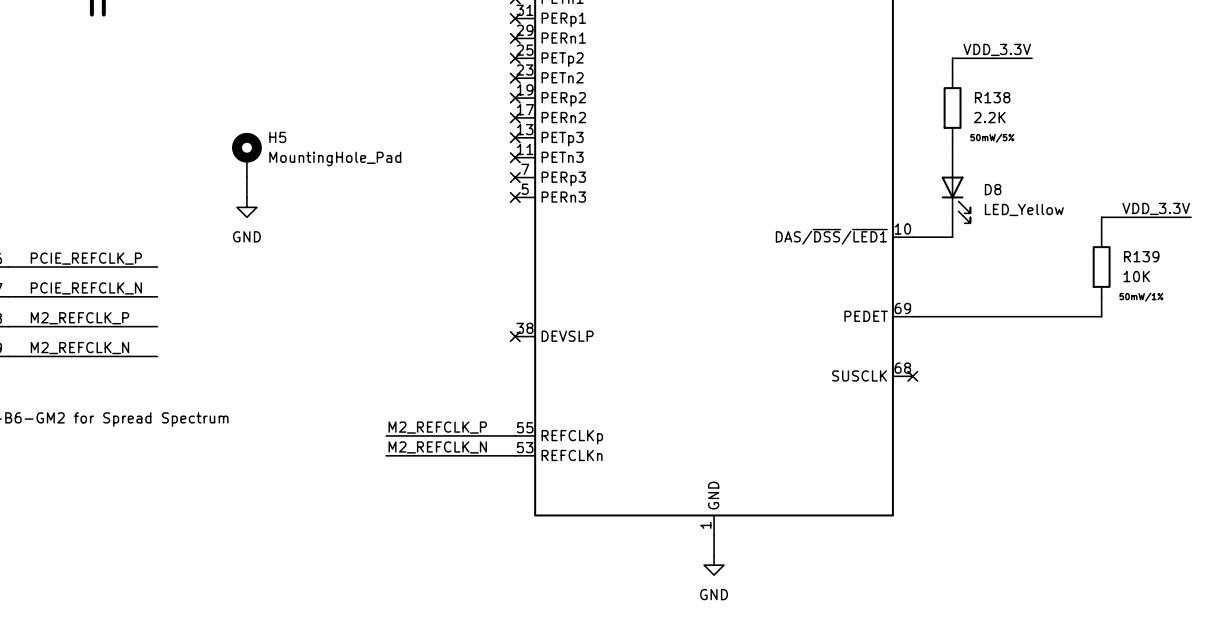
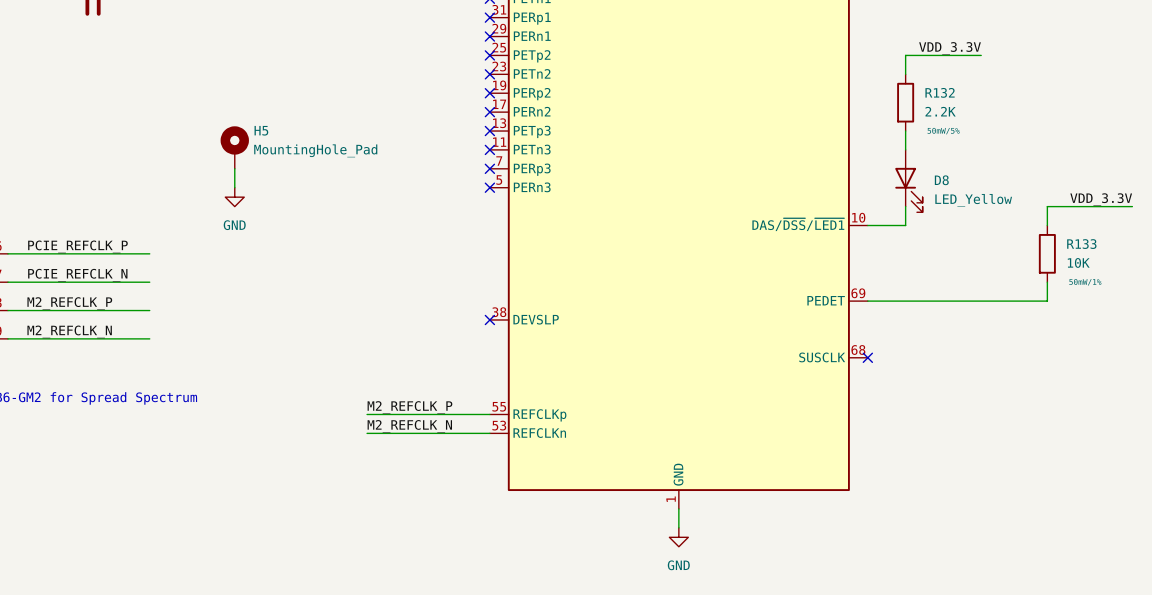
R138 name: R138 (992, 97) -> R132 (940, 92)
R139 name: R139 (1141, 256) -> R133 (1081, 244)

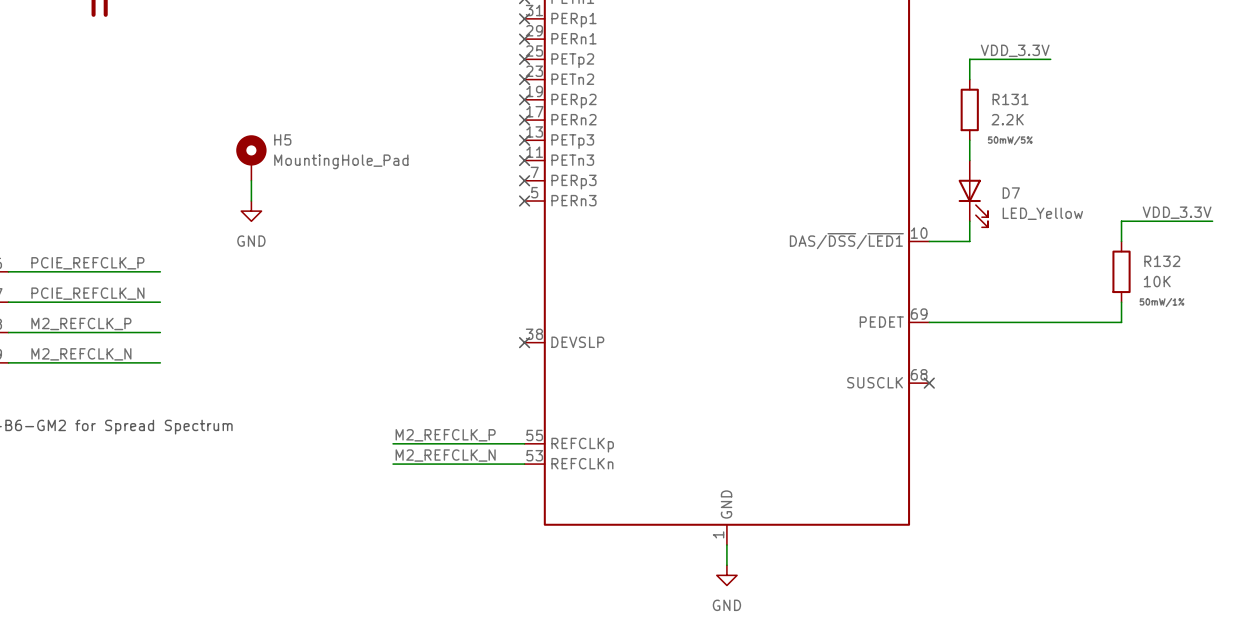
R132 name: R132 (940, 92) -> R131 (1010, 99)
D8 name: D8 (941, 180) -> D7 (1011, 193)
R133 name: R133 (1081, 244) -> R132 (1162, 261)

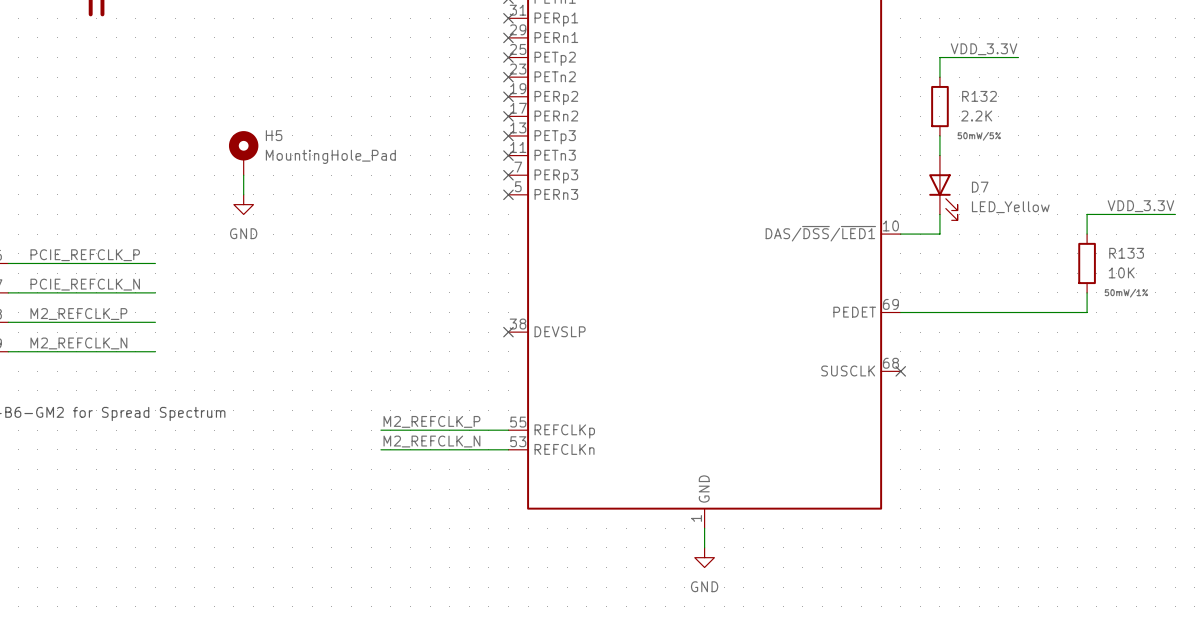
R131 name: R131 (1010, 99) -> R132 (979, 96)
R132 name: R132 (1162, 261) -> R133 (1126, 253)

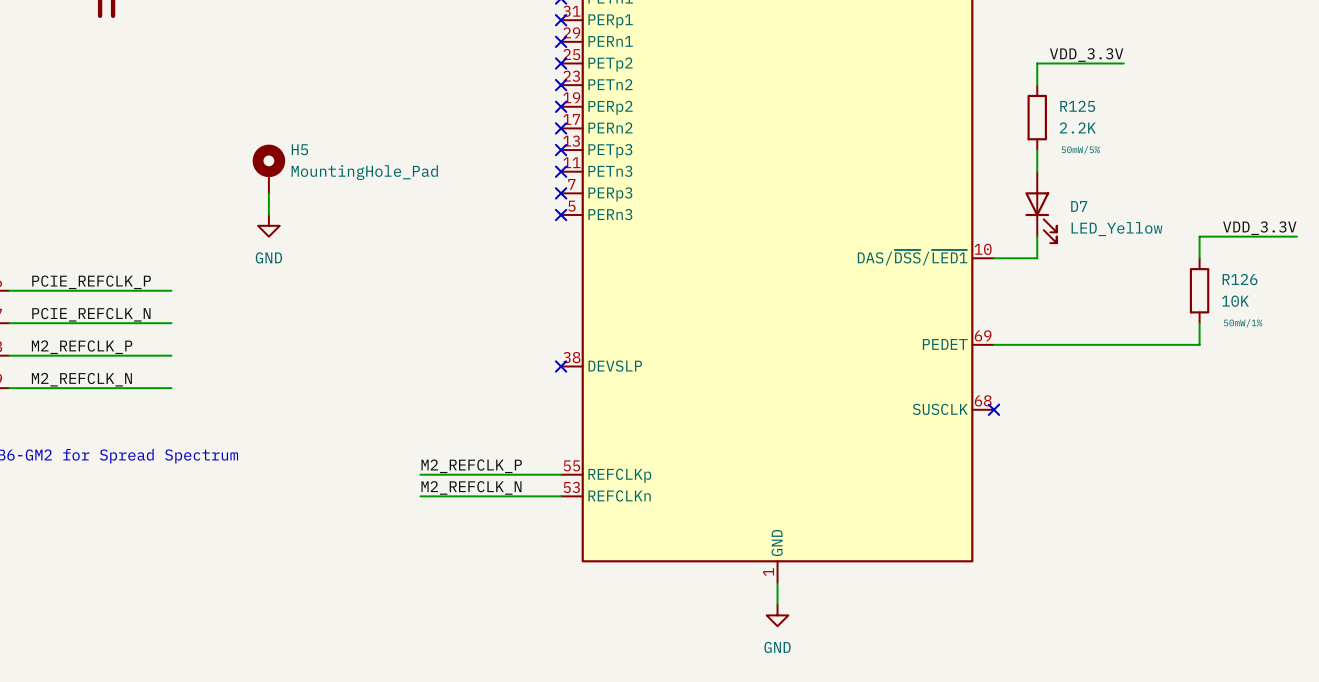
R132 name: R132 (979, 96) -> R125 (1077, 106)
R133 name: R133 (1126, 253) -> R126 (1240, 279)

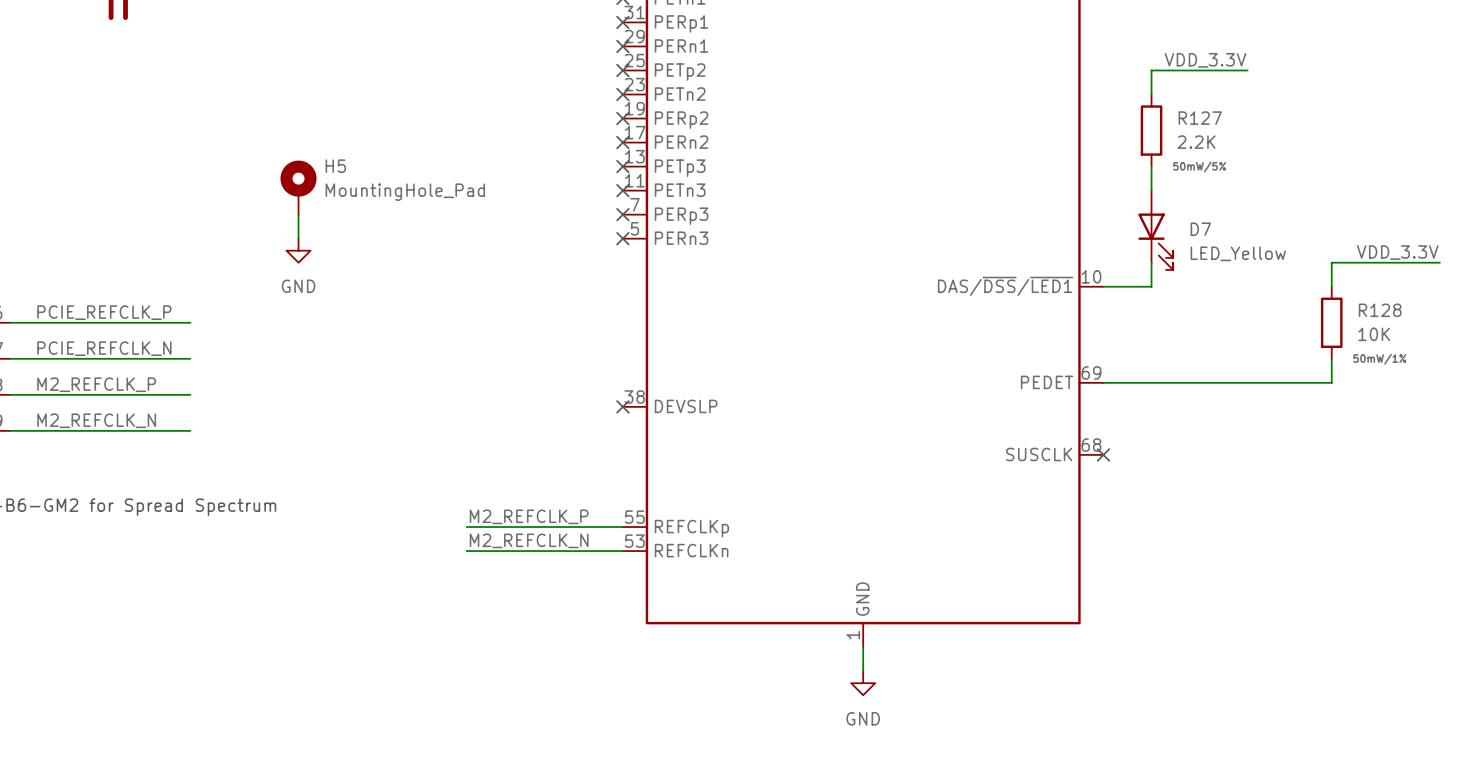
R125 name: R125 (1077, 106) -> R127 (1200, 118)
R126 name: R126 (1240, 279) -> R128 (1380, 310)

